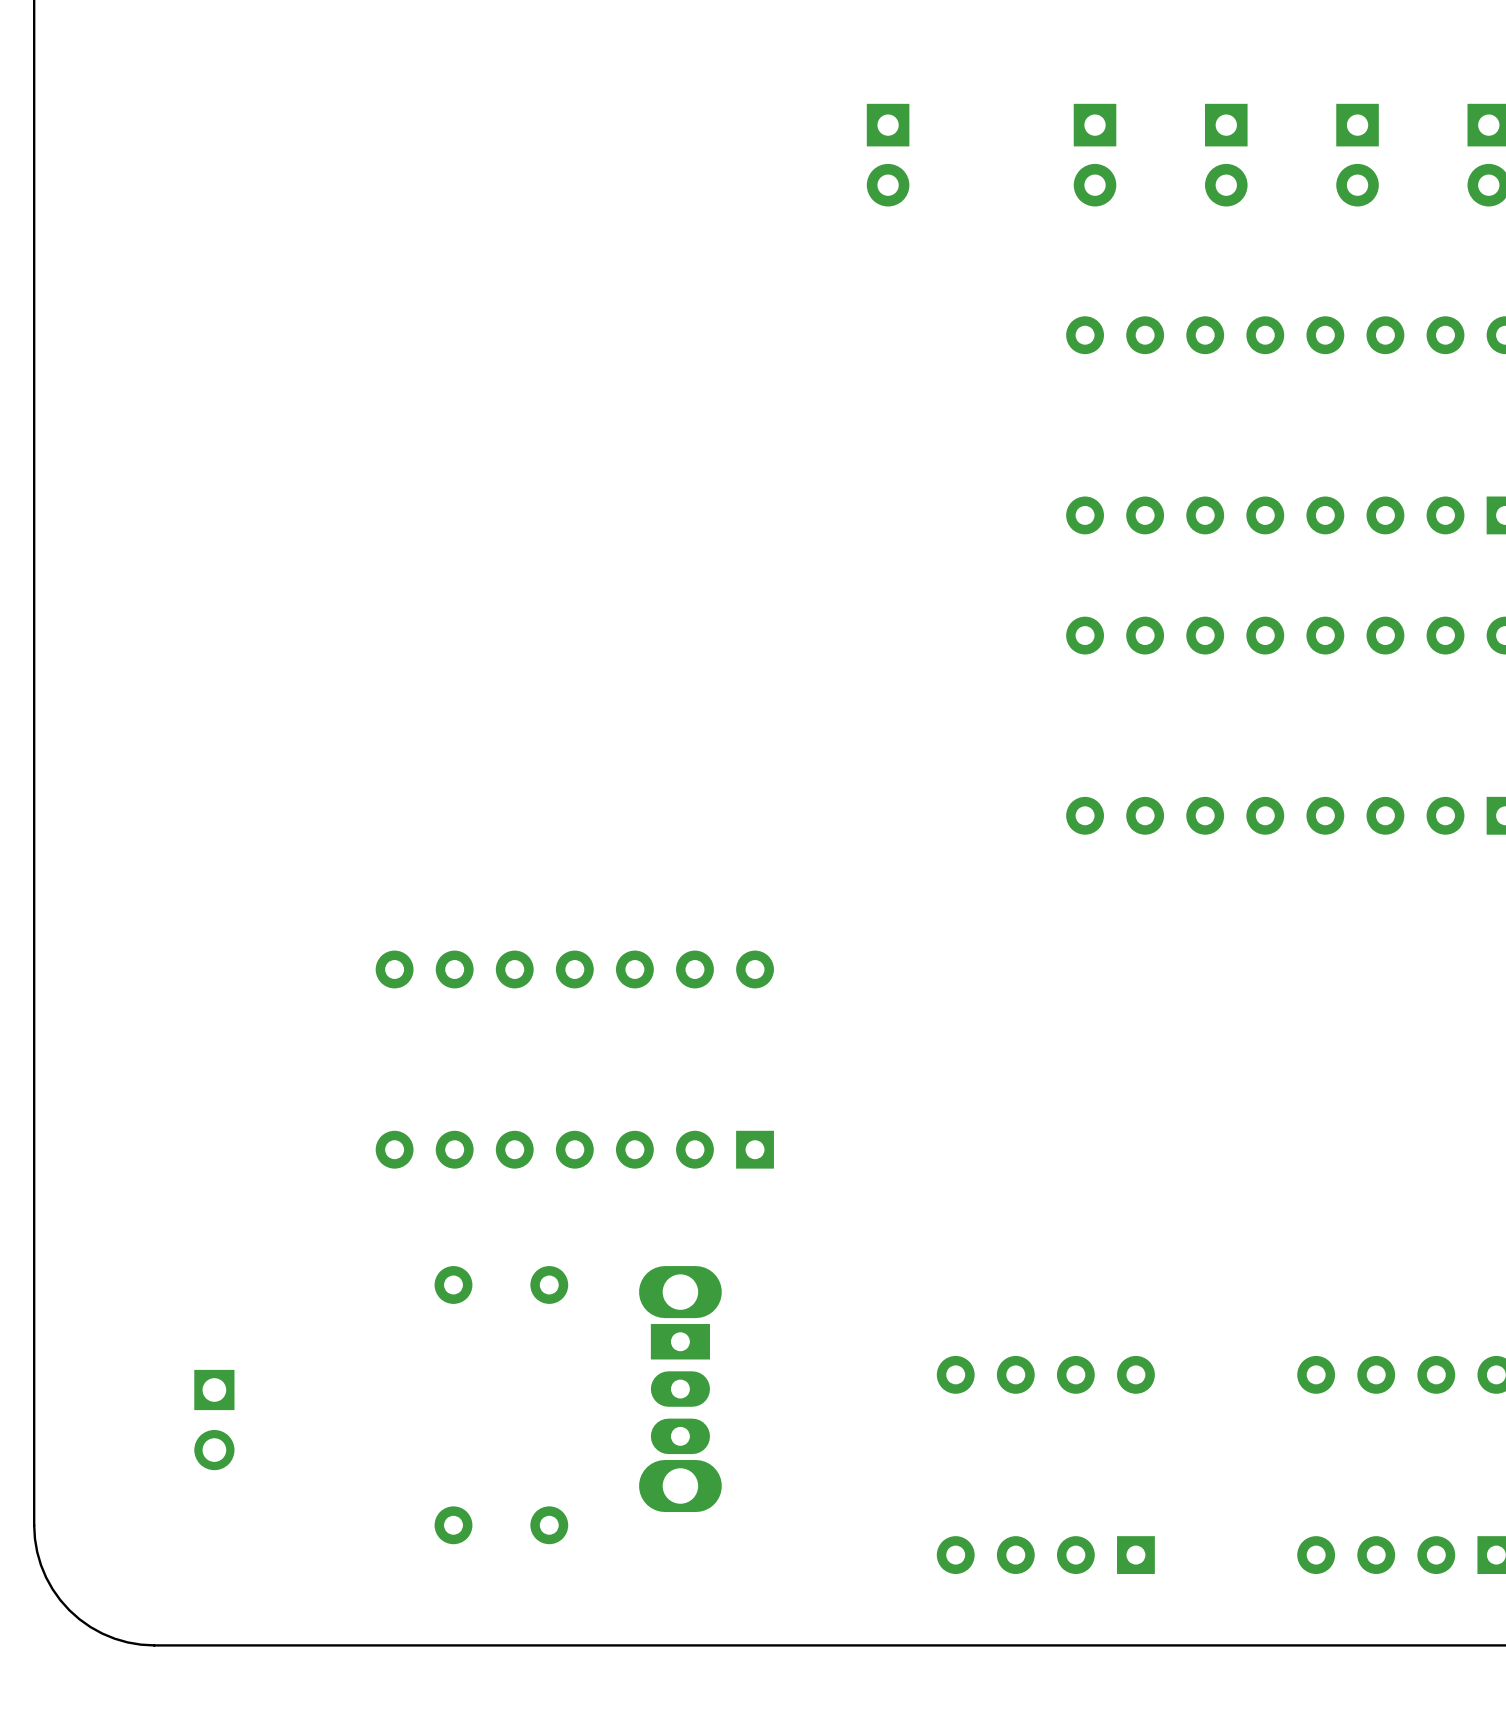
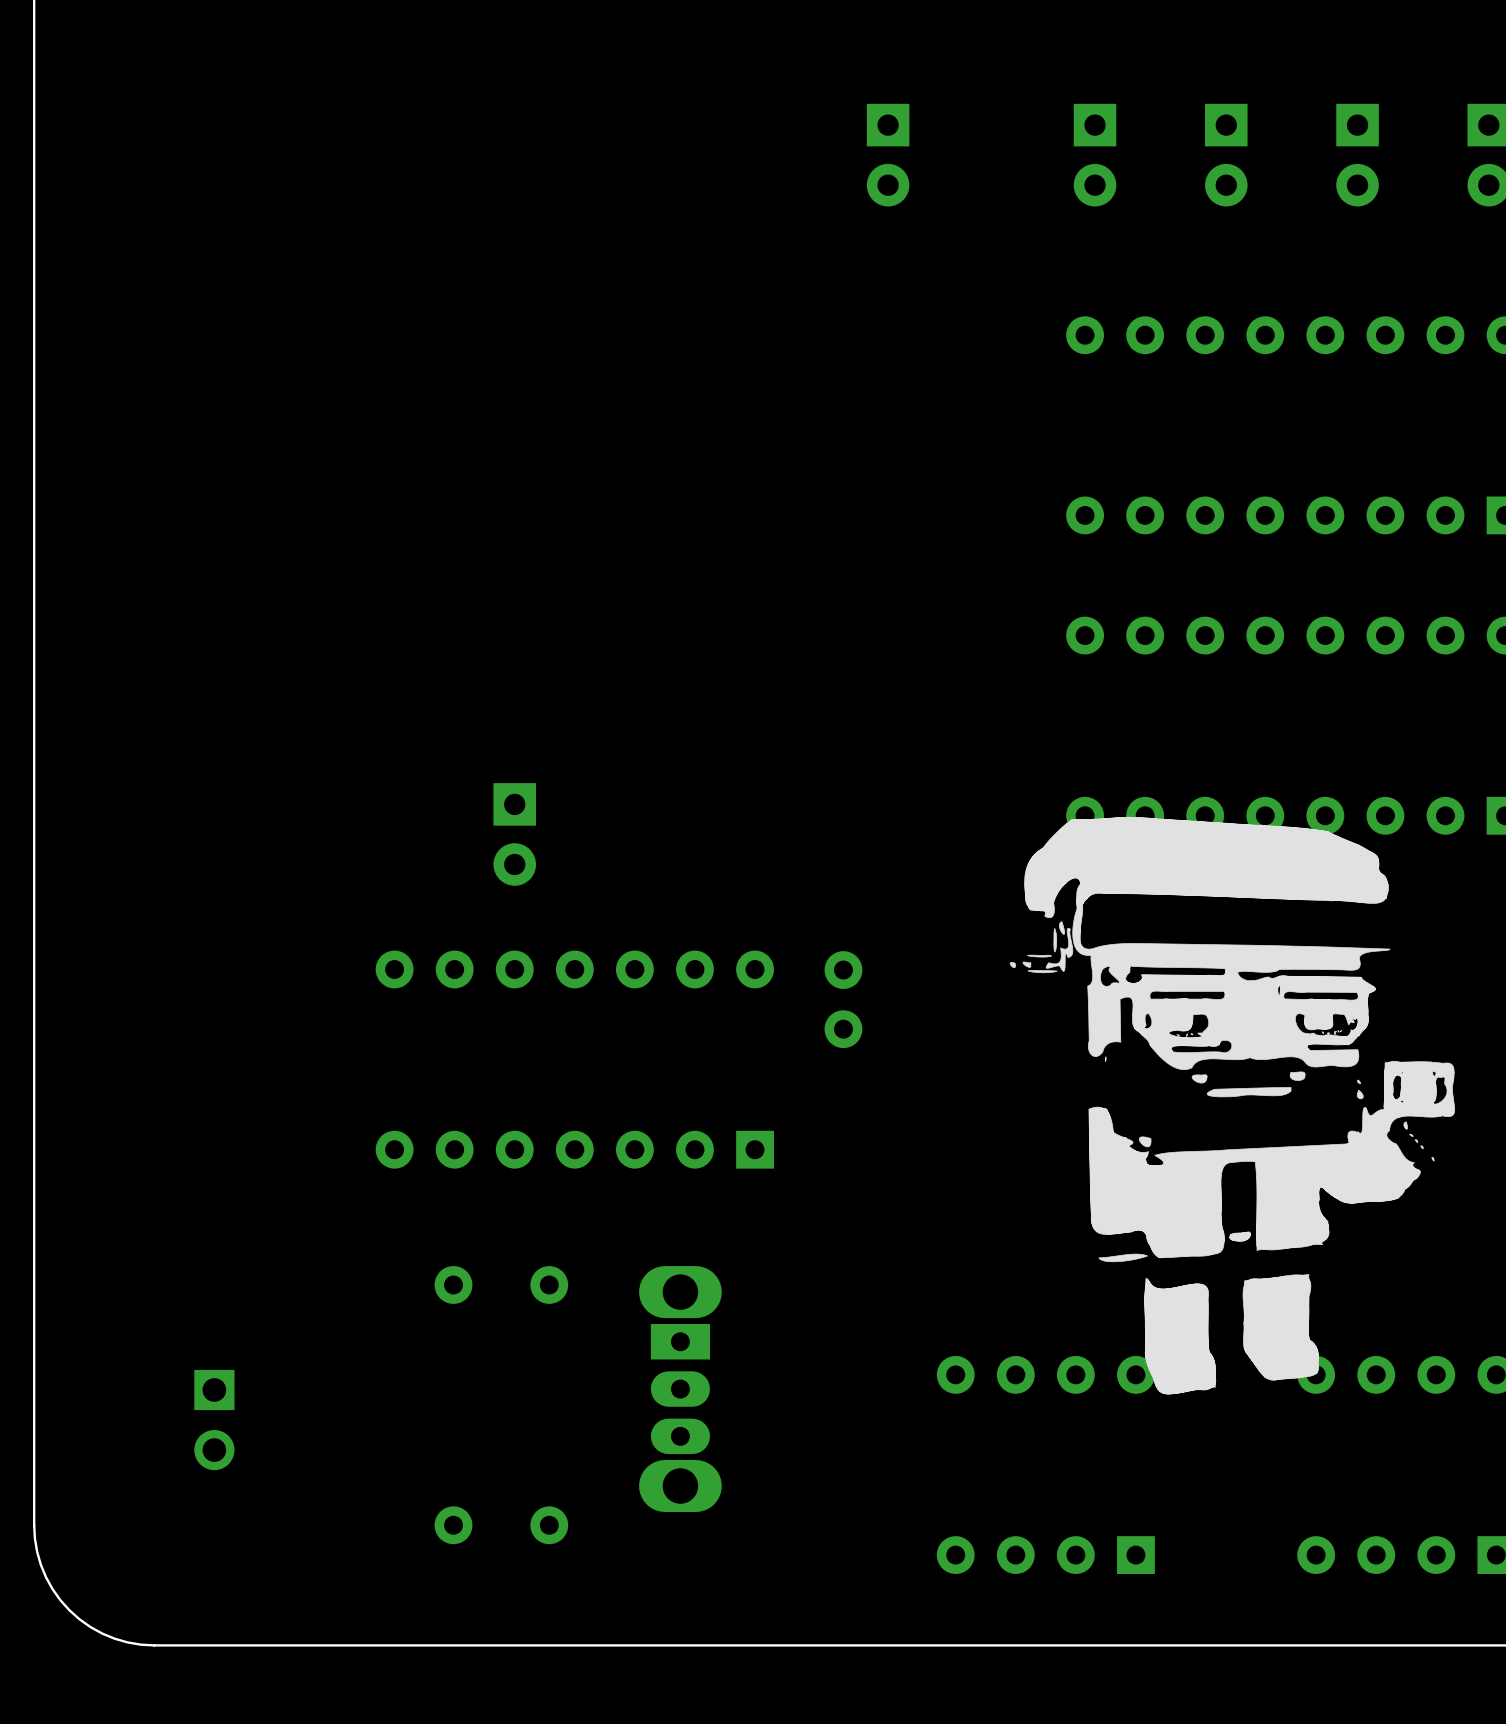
drawing: none -> [1009, 816, 1456, 1395]
part: none -> (514, 834)
part: none -> (843, 999)

